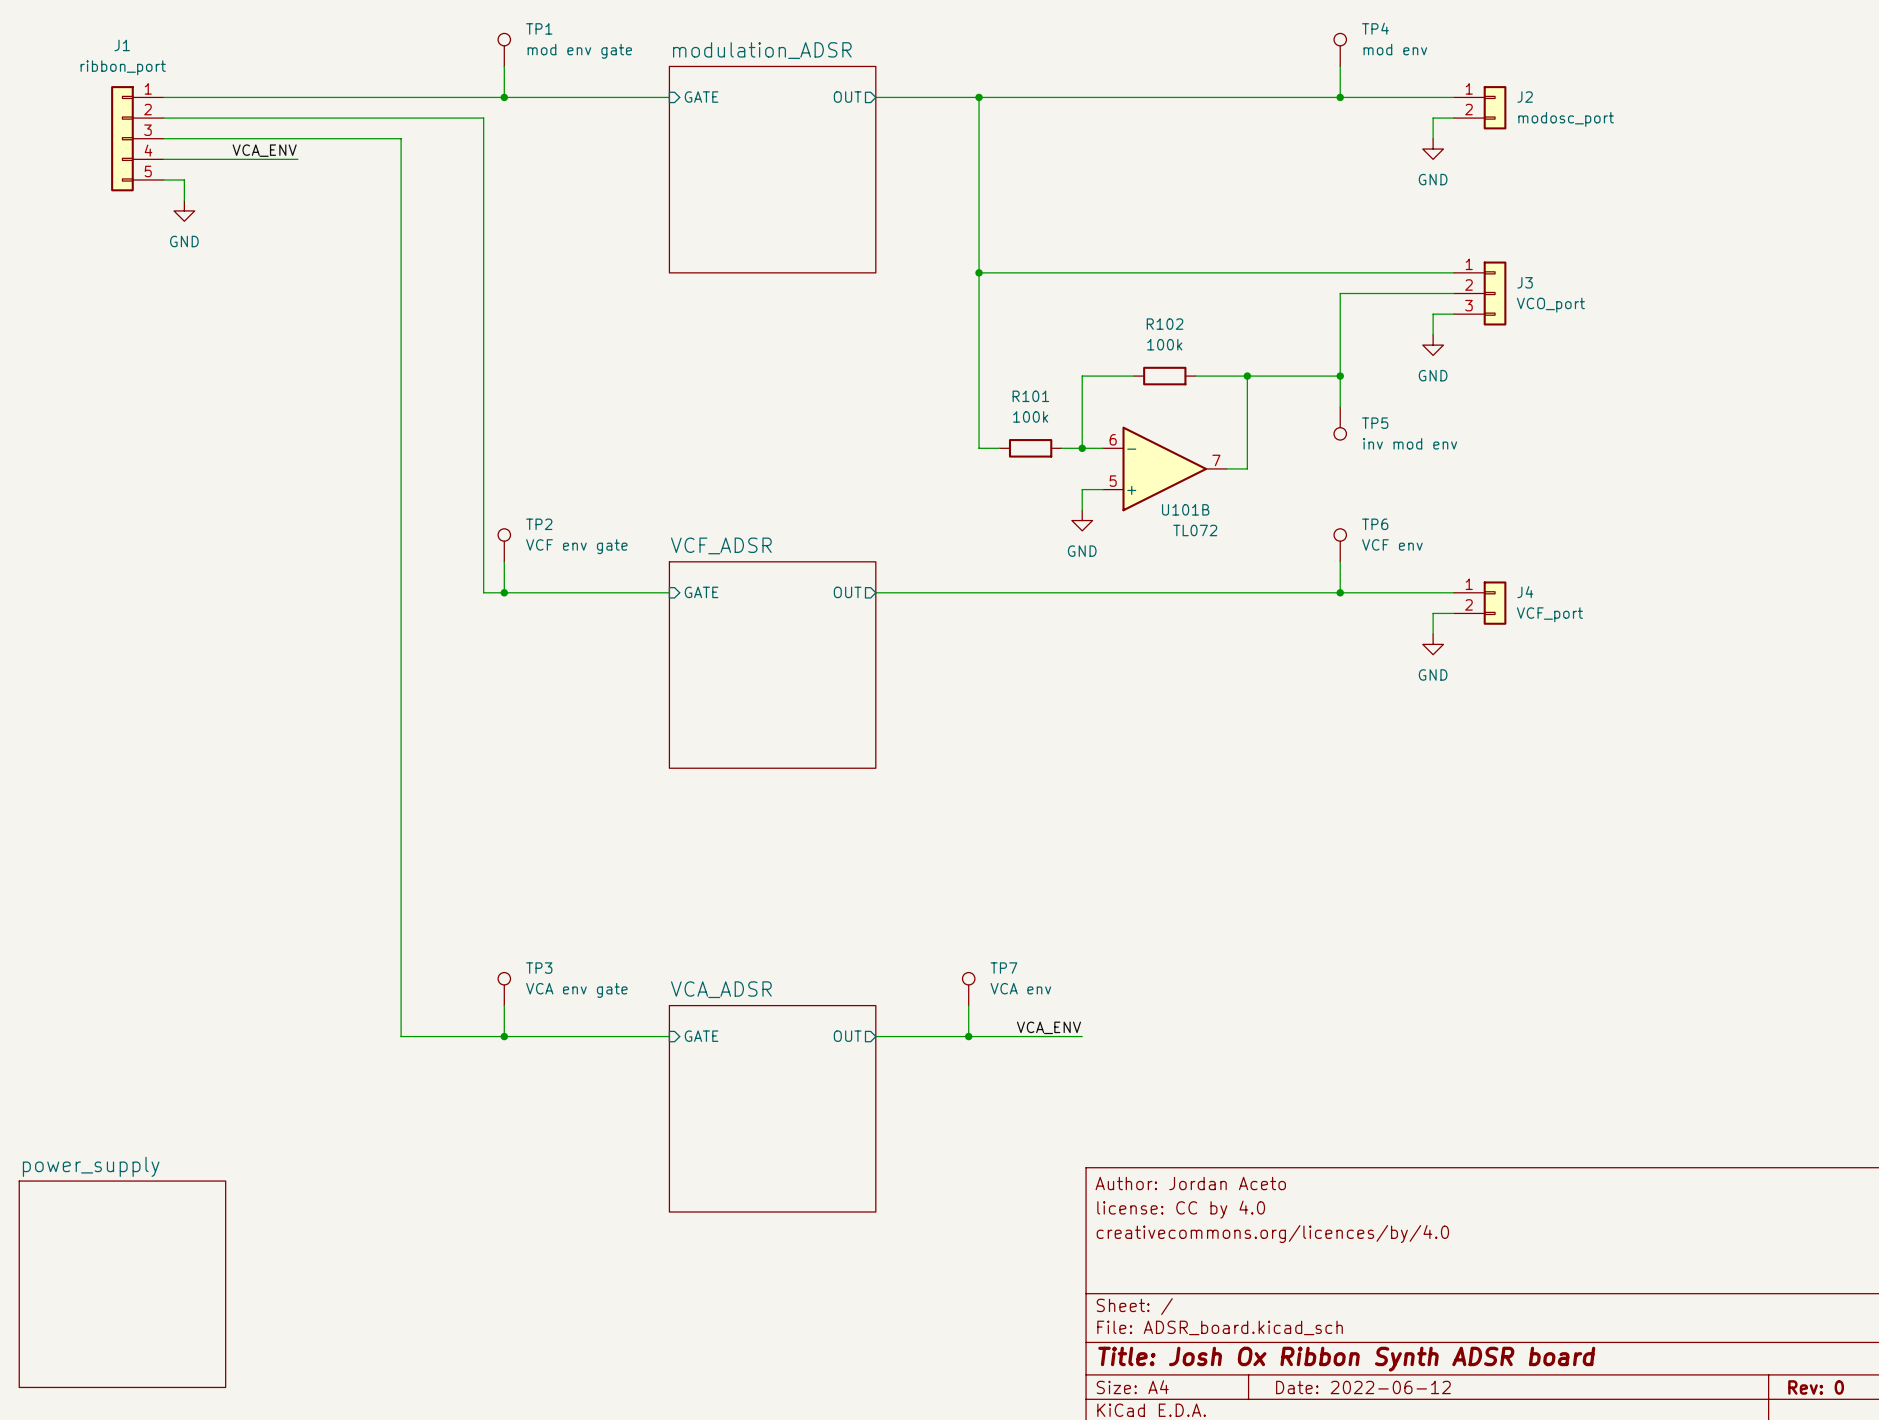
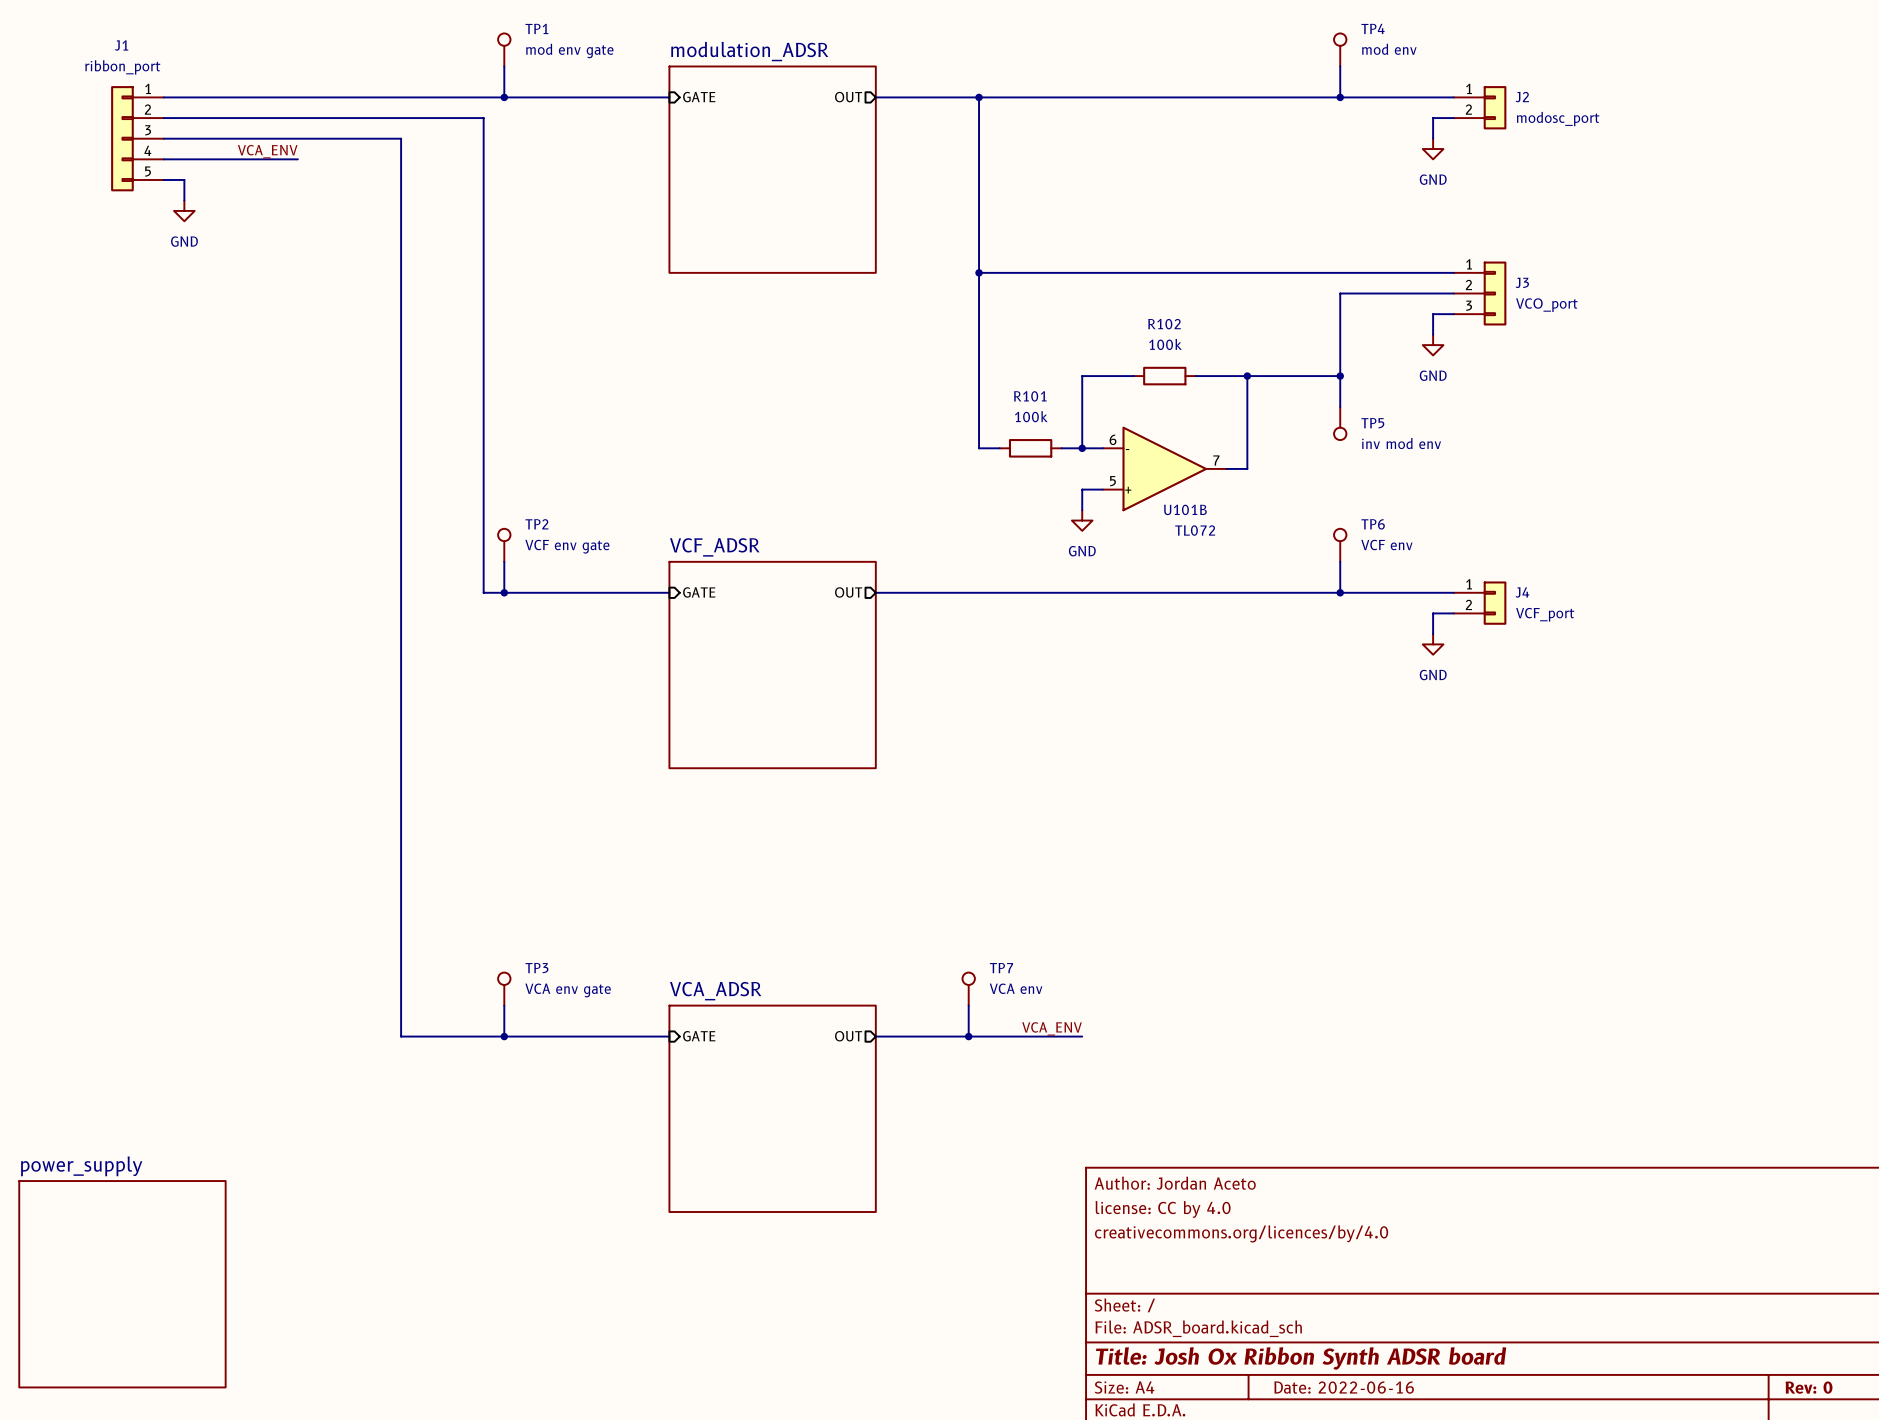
title block: Date: 2022-06-12 (1363, 1387) -> Date: 2022-06-16 (1344, 1387)

